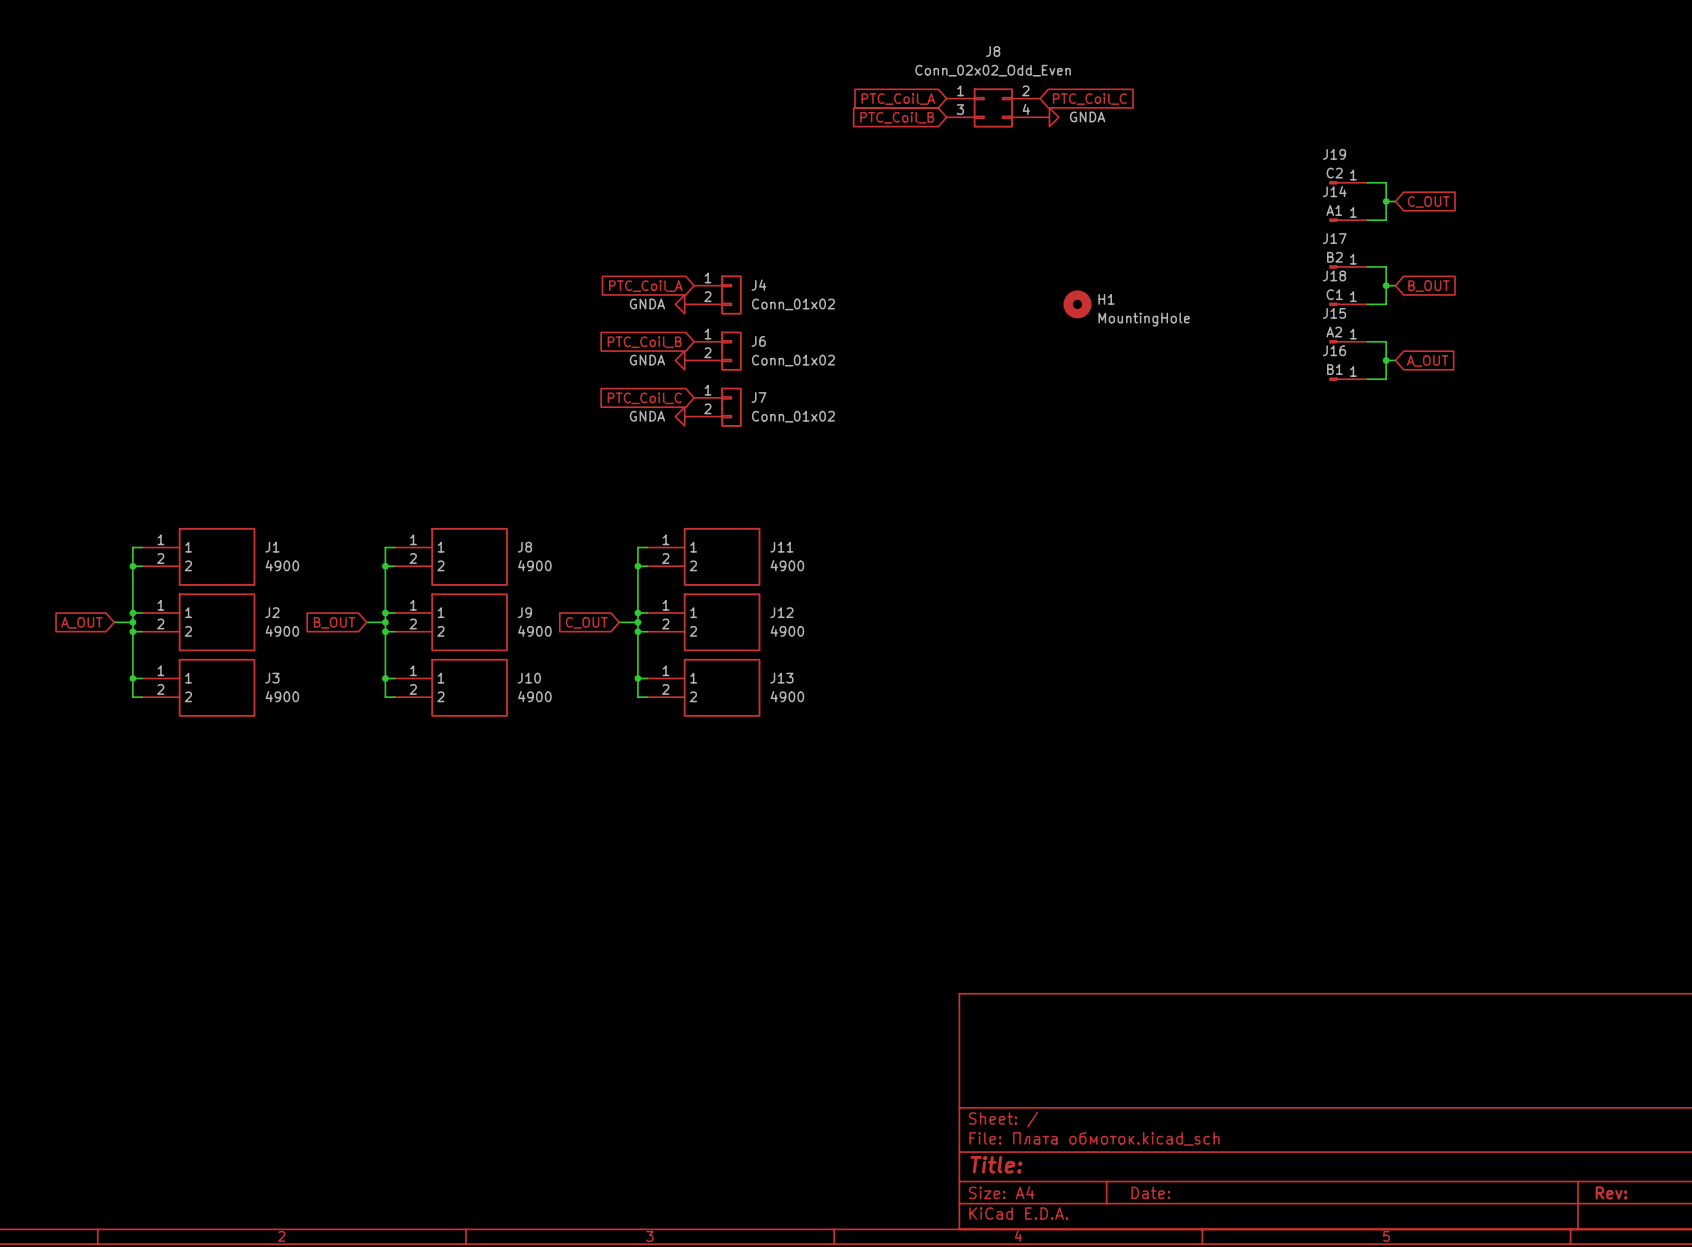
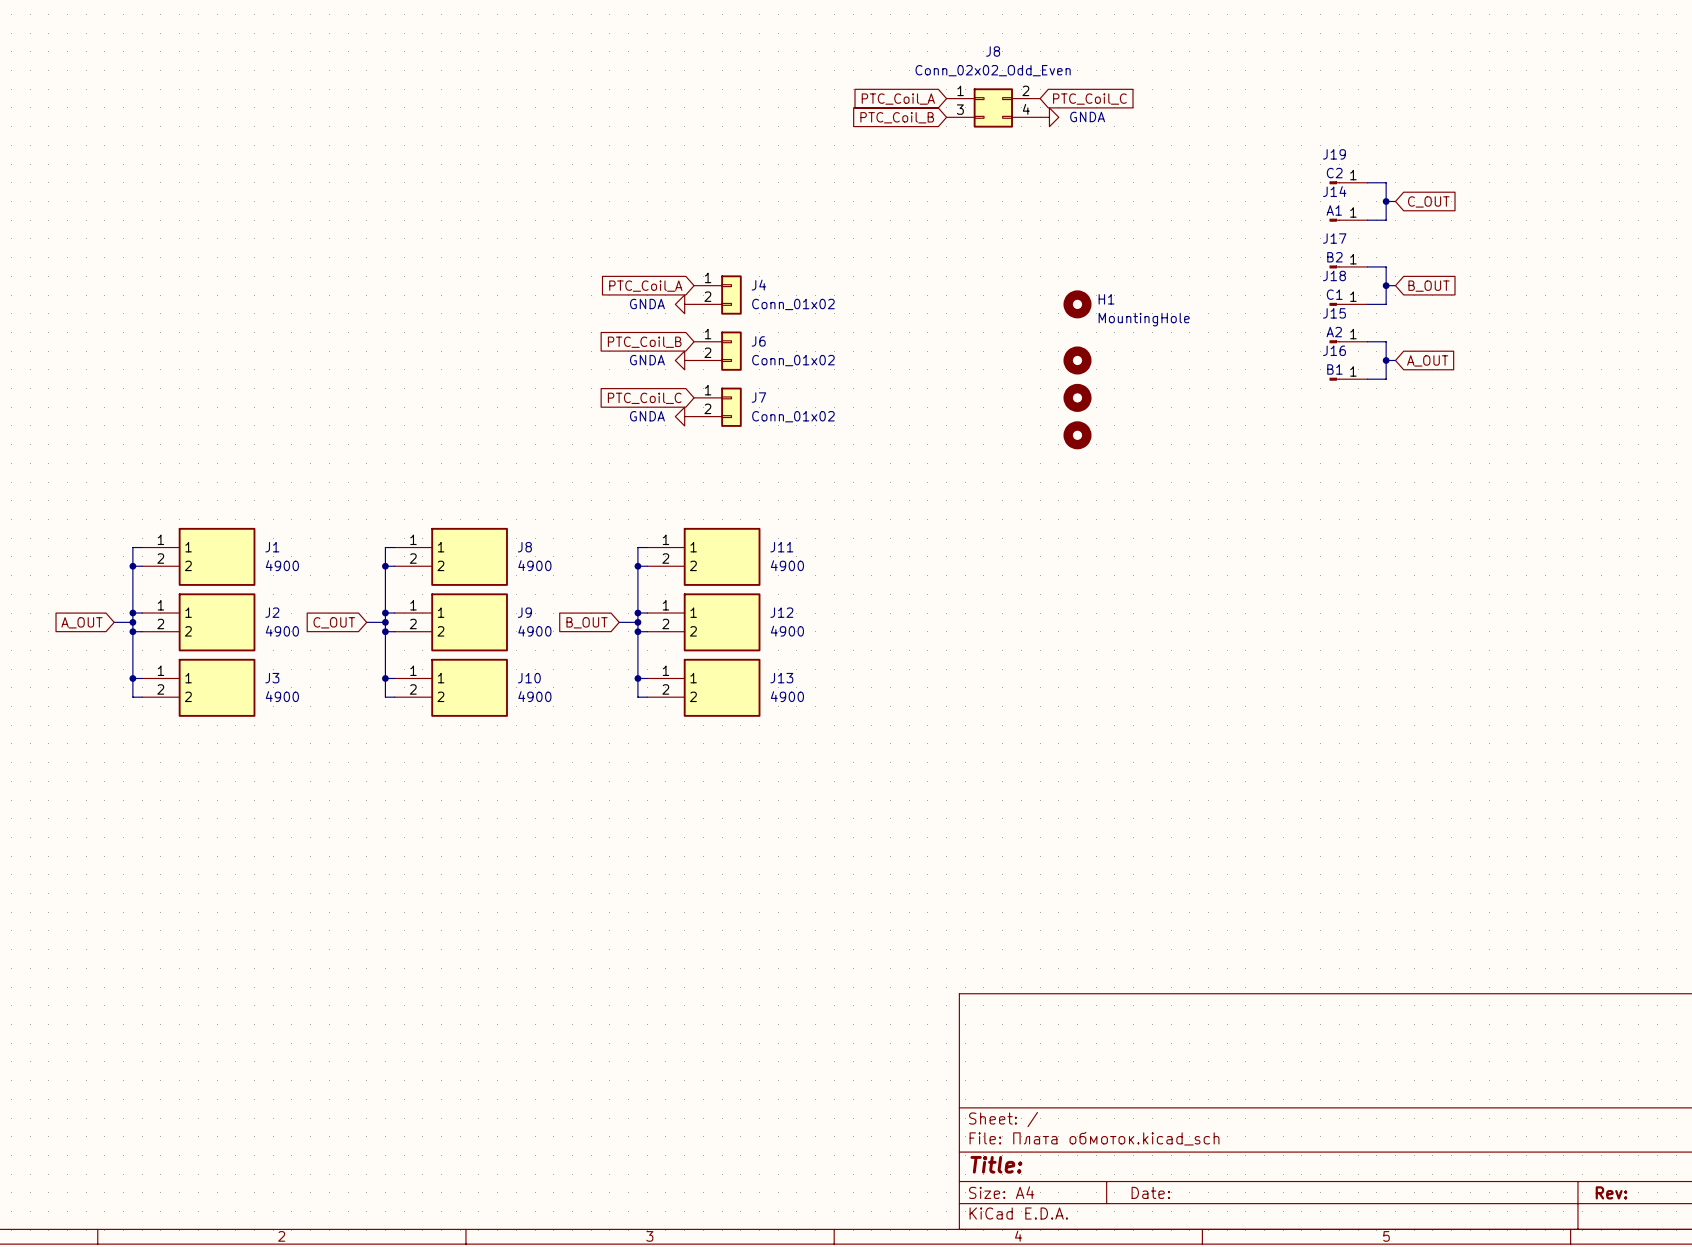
part: none -> (1077, 360)
part: none -> (1077, 397)
part: none -> (1077, 435)
global label: B_OUT (334, 622) -> C_OUT (334, 622)
global label: C_OUT (586, 622) -> B_OUT (587, 622)

